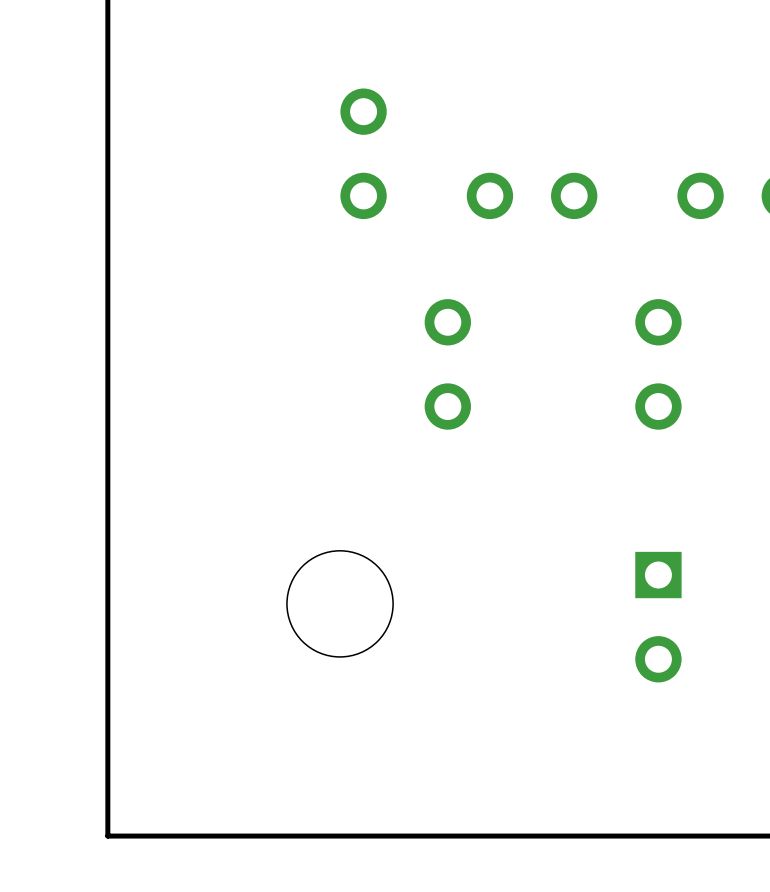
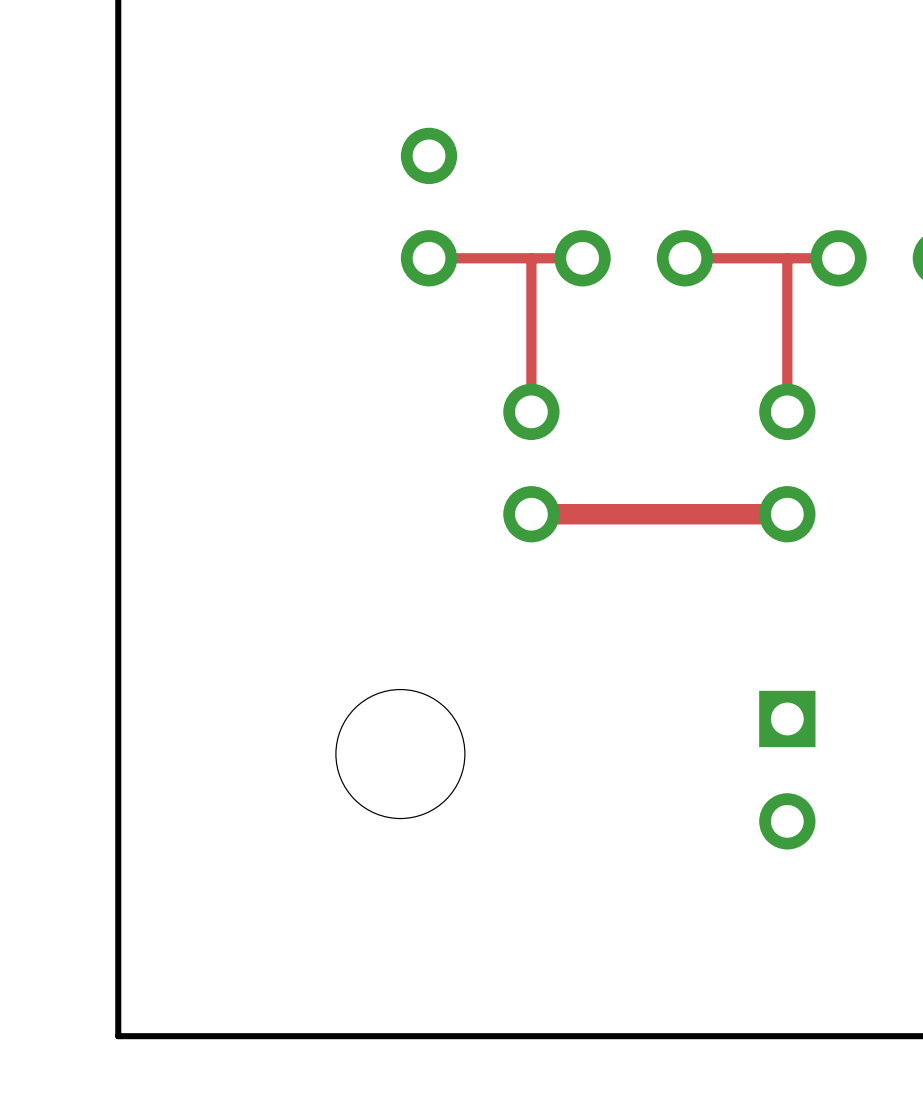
top track: none -> (531, 258) (531, 411)
top track: none -> (582, 258) (429, 258)
top track: none -> (787, 258) (787, 411)
top track: none -> (838, 258) (684, 258)
top track: none -> (787, 514) (531, 514)

